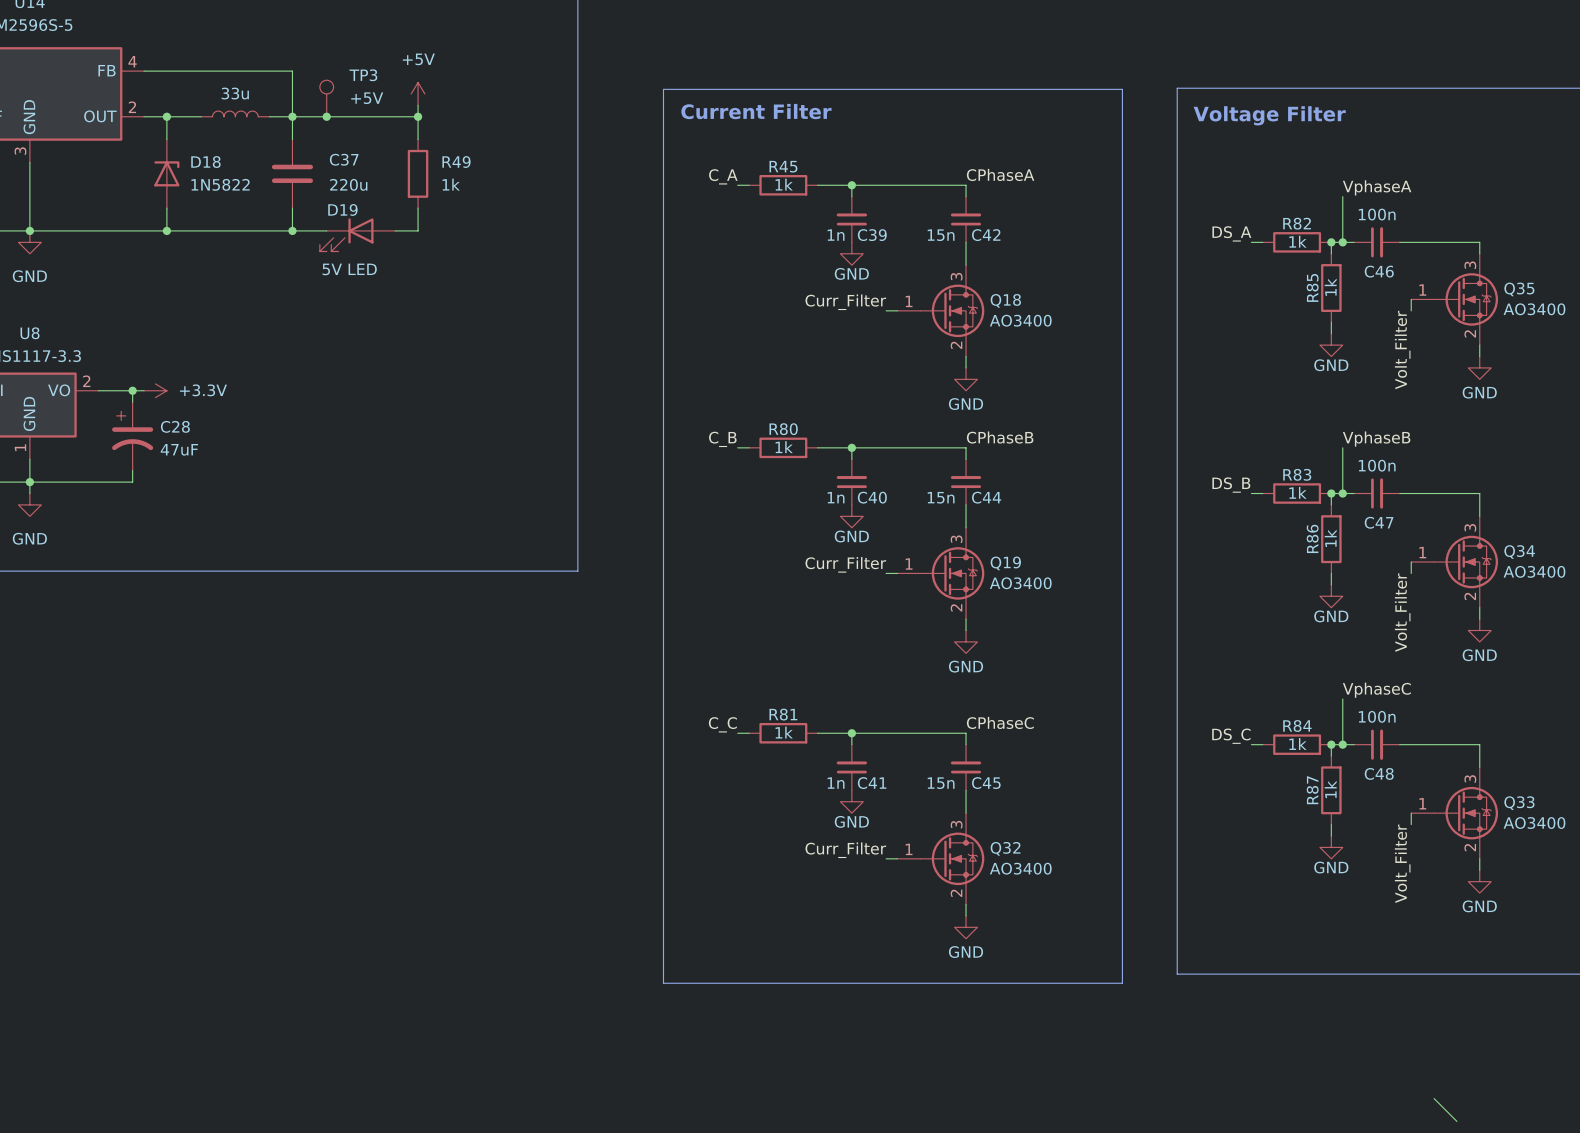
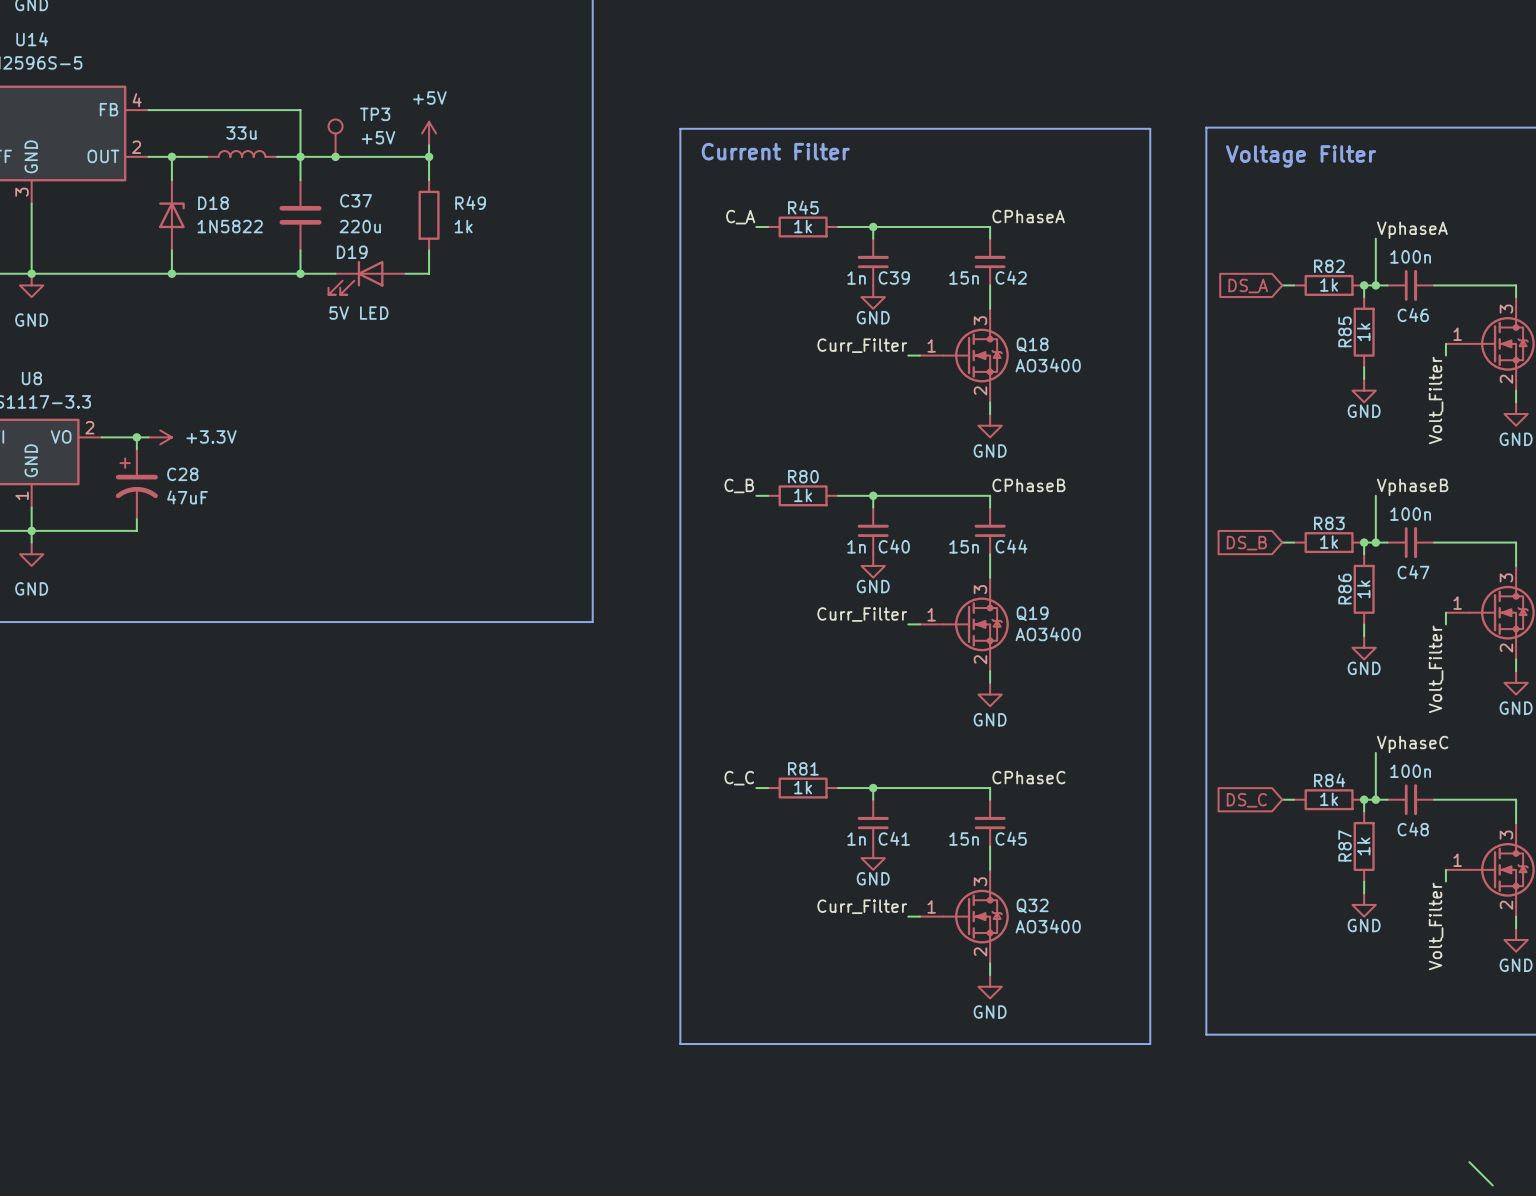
label: DS_A (1231, 233) -> none
global label: none -> DS_A (1248, 285)
label: DS_B (1231, 485) -> none
global label: none -> DS_B (1246, 543)
label: DS_C (1231, 736) -> none
global label: none -> DS_C (1246, 800)

